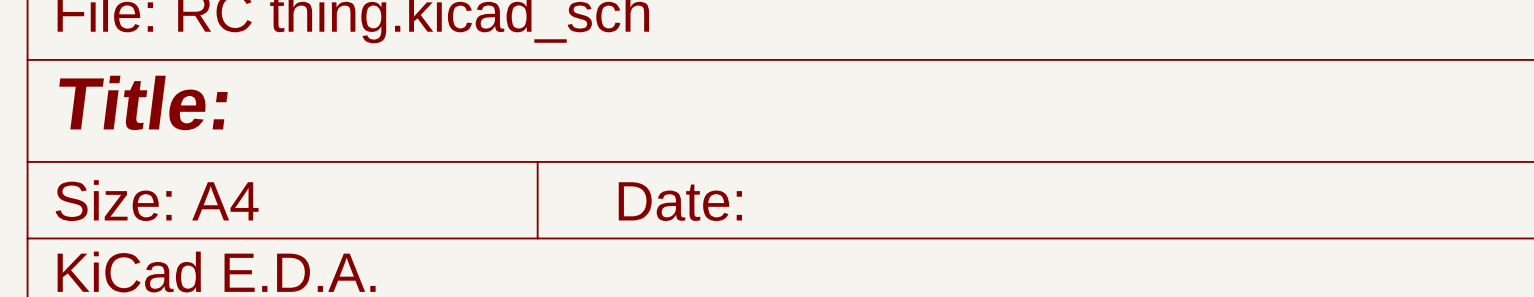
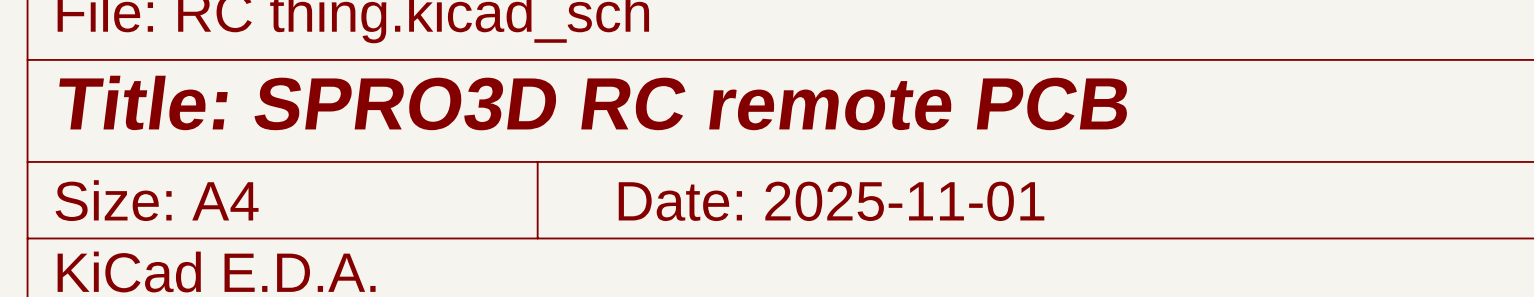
title block: Title: (143, 102) -> Title: SPRO3D RC remote PCB (593, 103)
title block: Date: (680, 201) -> Date: 2025-11-01 (831, 201)

